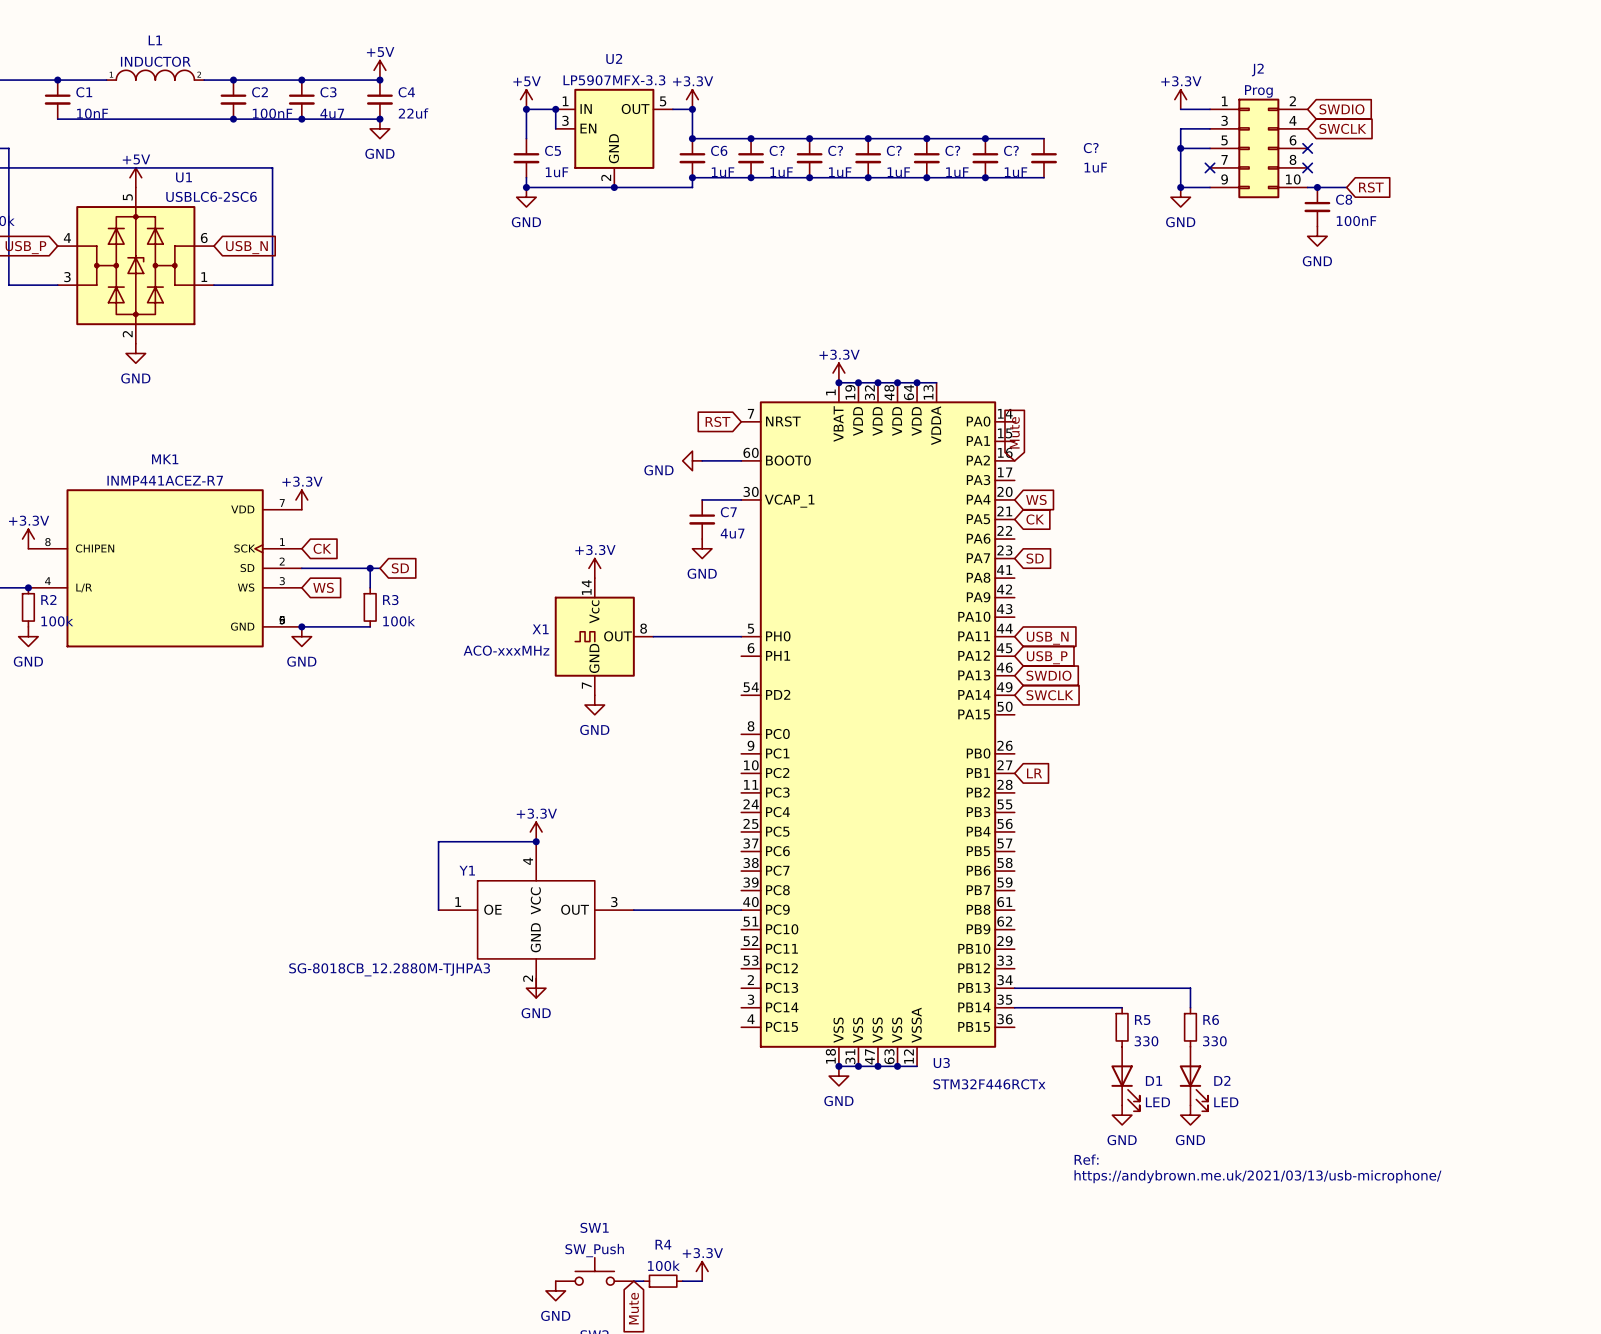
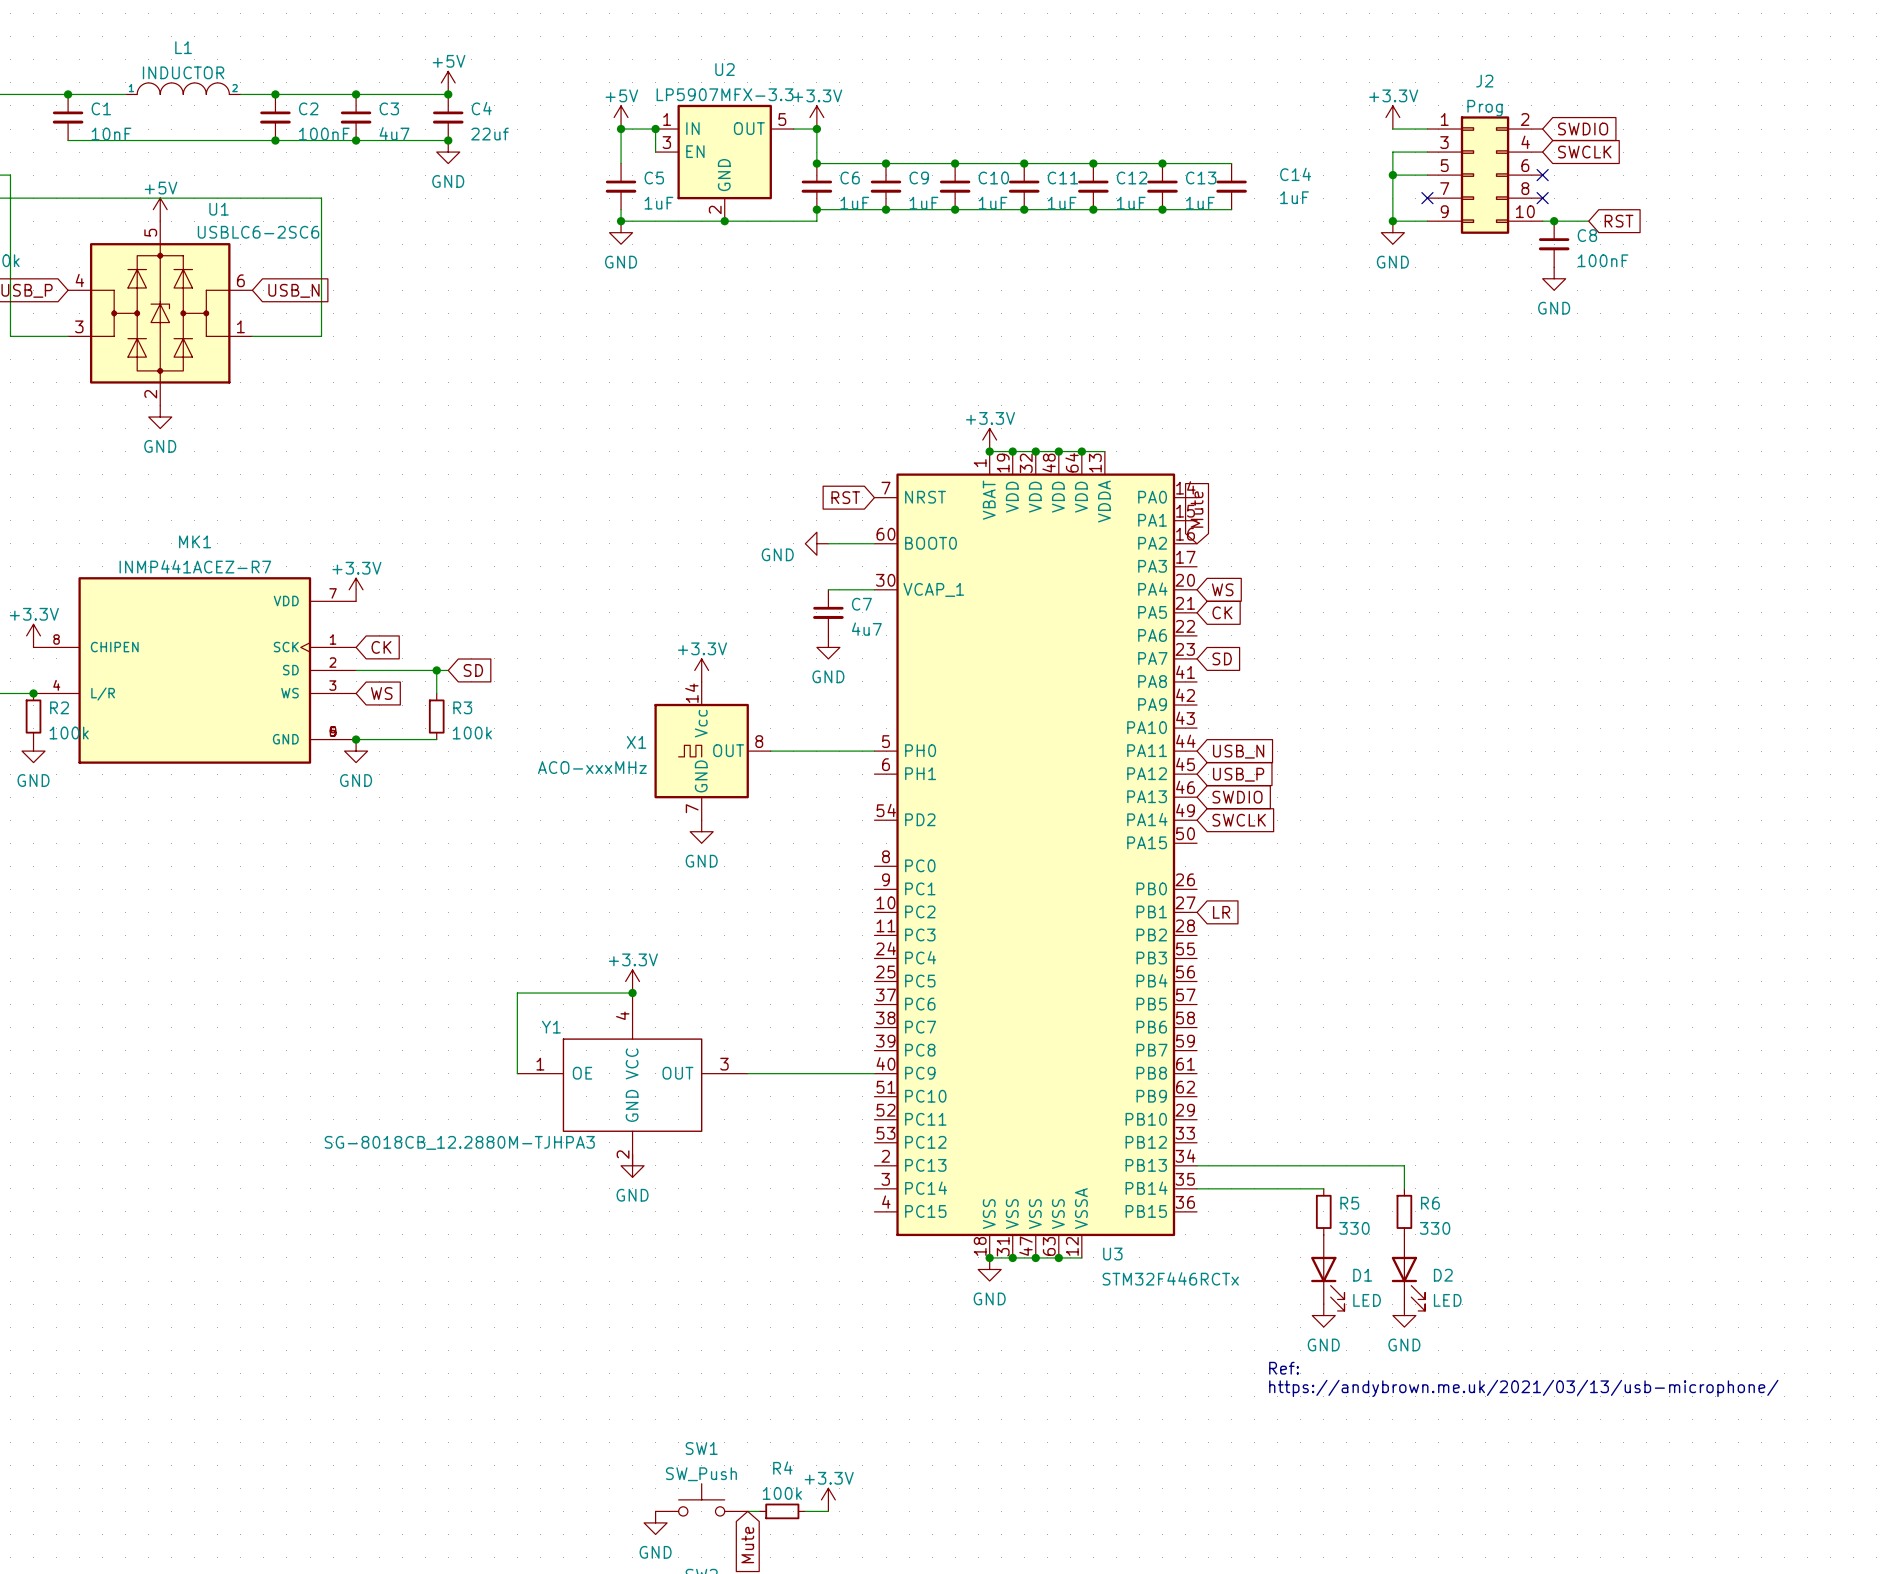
C? name: C? (1091, 148) -> C14 (1295, 174)
C? name: C? (777, 150) -> C9 (919, 177)
C? name: C? (835, 150) -> C10 (993, 177)
C? name: C? (894, 150) -> C11 (1062, 177)
C? name: C? (952, 150) -> C12 (1132, 177)
C? name: C? (1011, 150) -> C13 (1201, 177)

